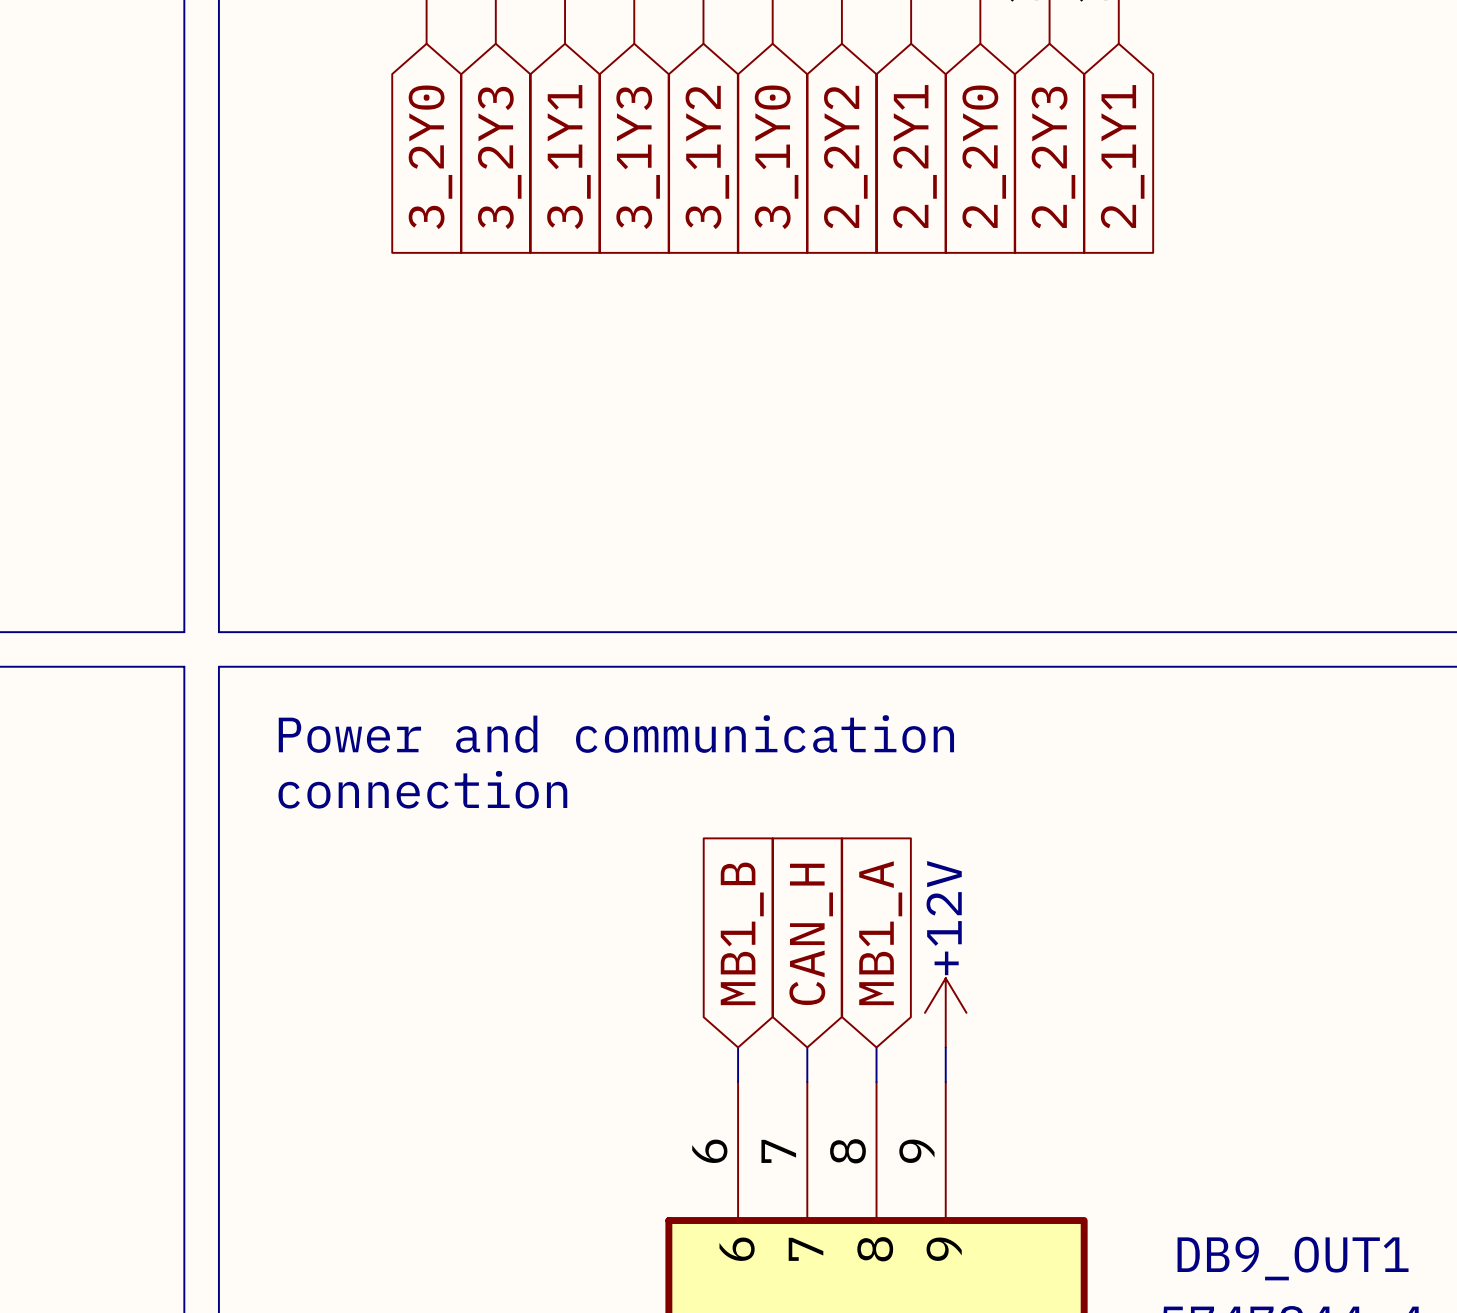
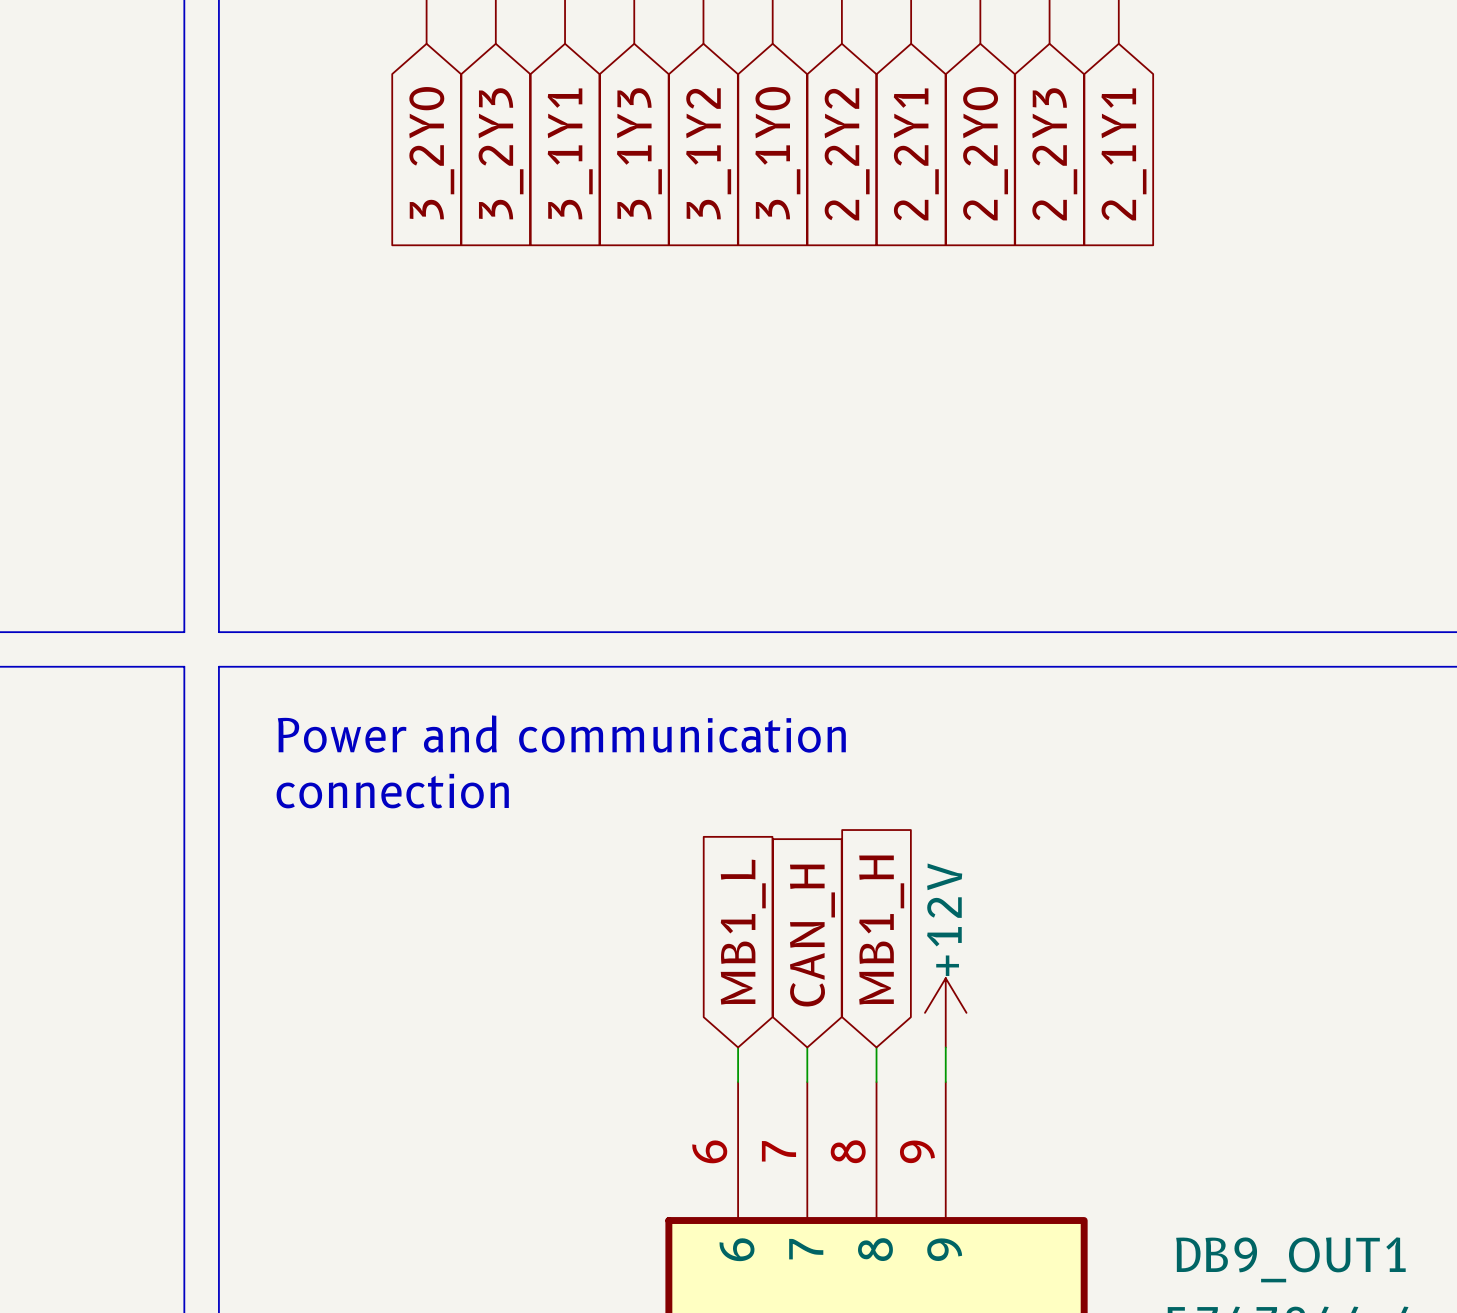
global label: MB1_B (742, 933) -> MB1_L (743, 932)
global label: MB1_A (880, 933) -> MB1_H (881, 930)

